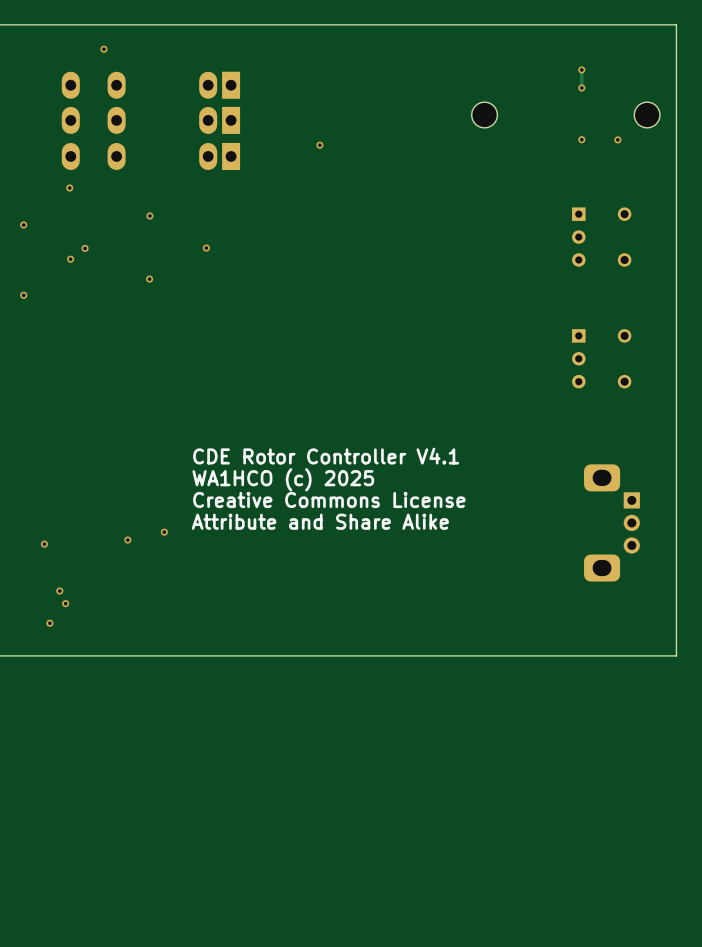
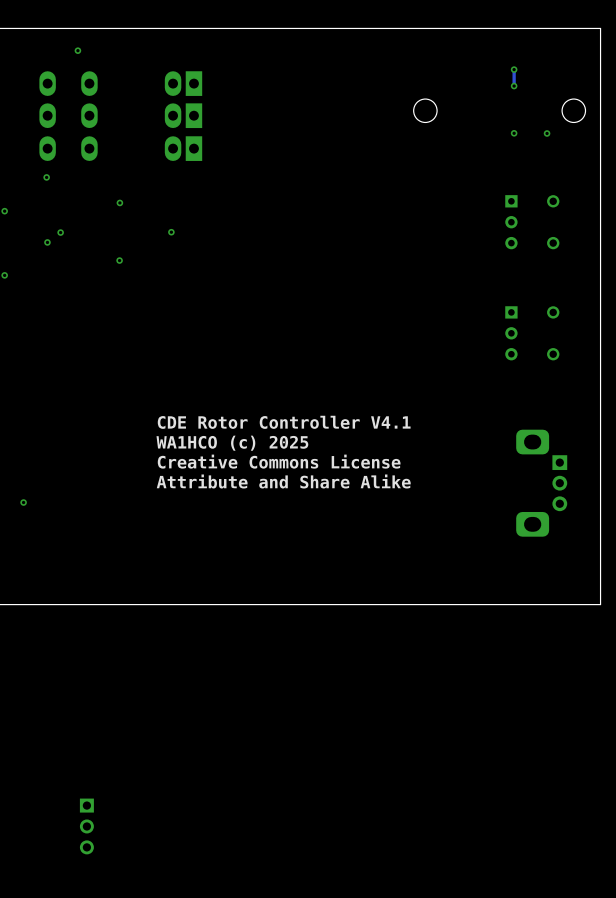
via: (319, 145) -> none
via: (164, 532) -> none
via: (127, 540) -> none
via: (59, 591) -> none
via: (65, 603) -> none
via: (49, 623) -> none
part: none -> (86, 826)

